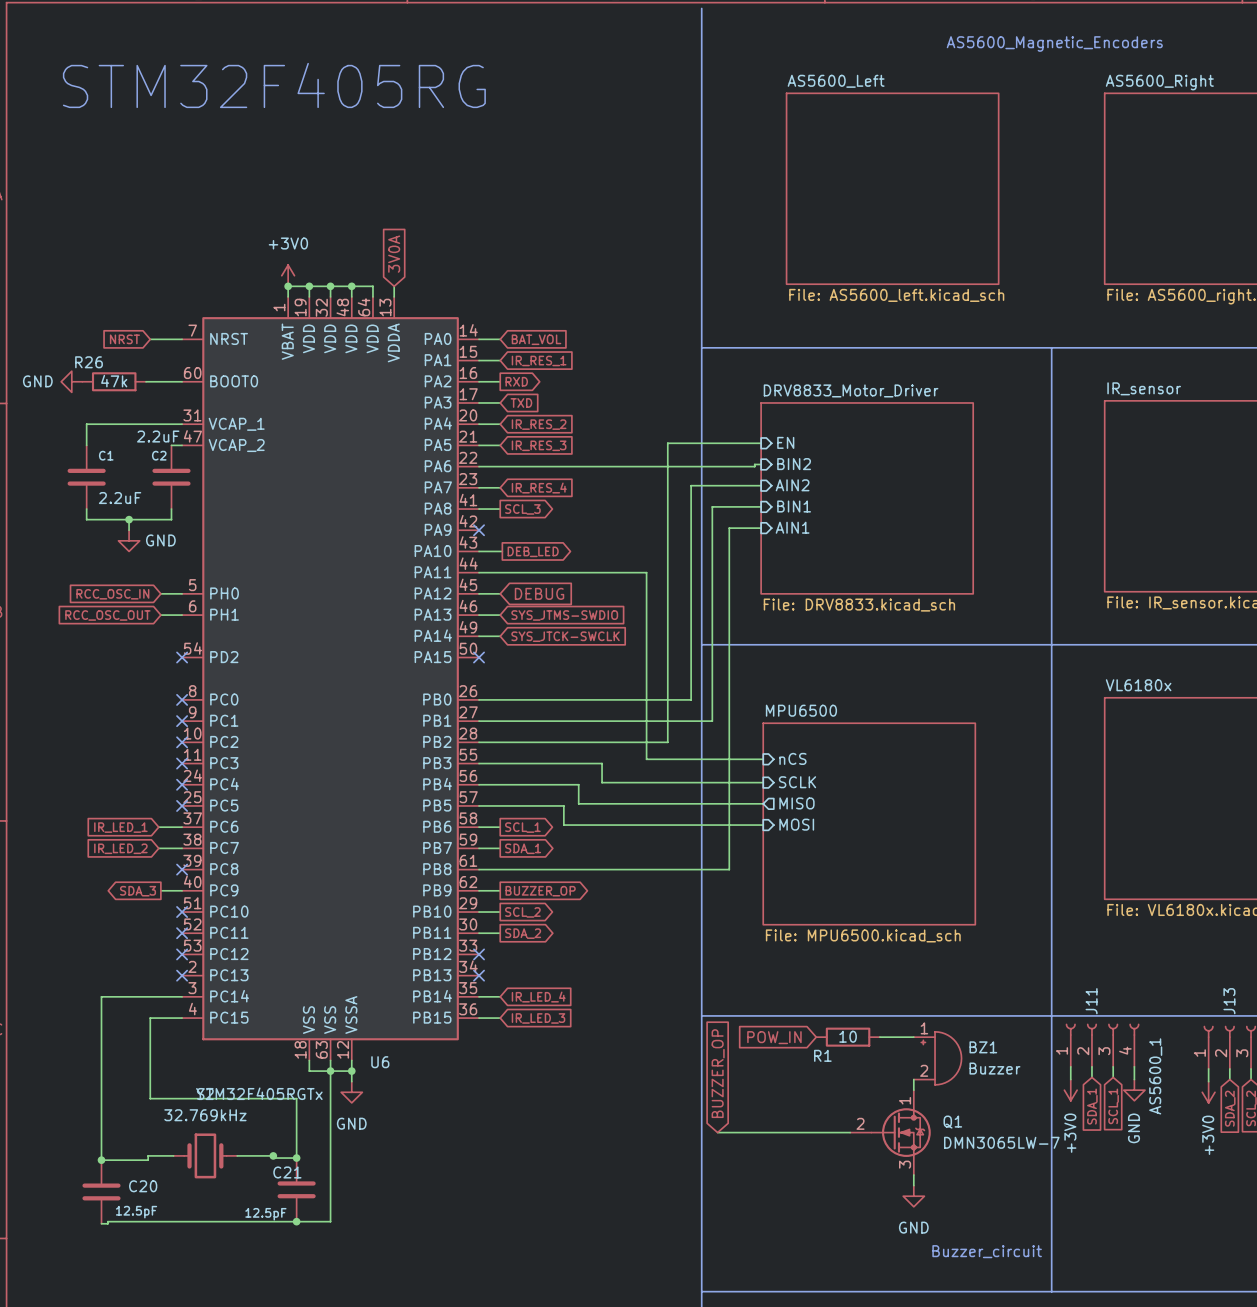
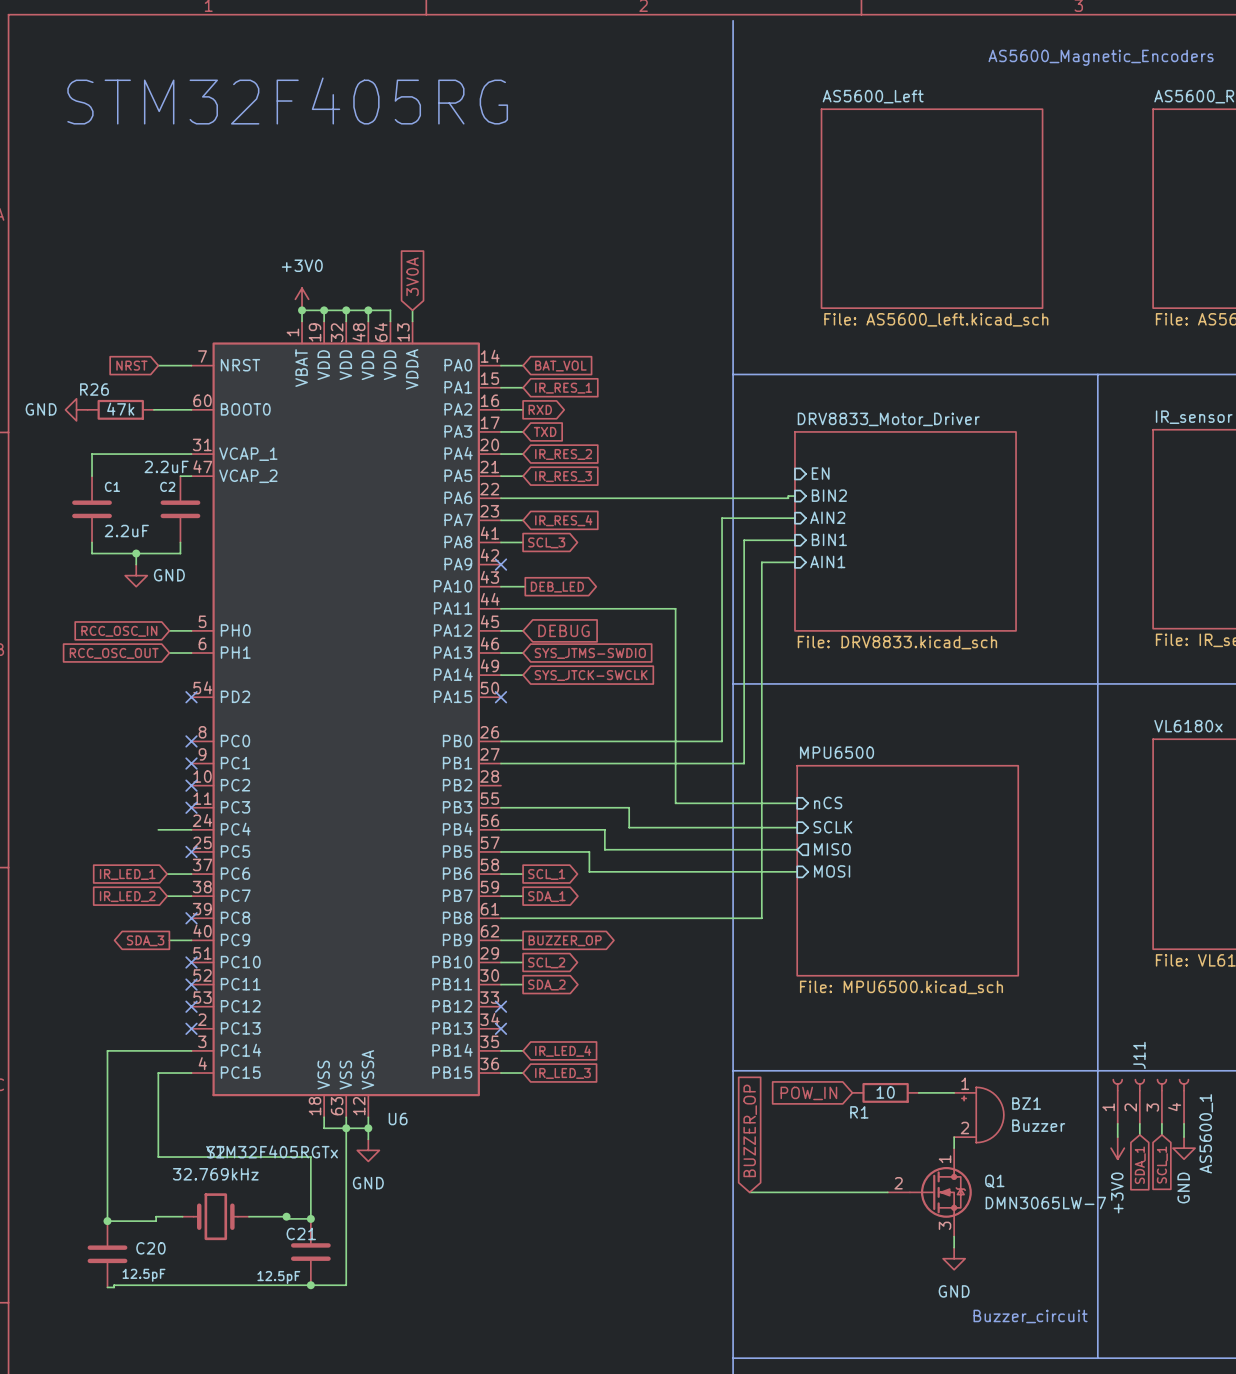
wire: (761, 443) (667, 443) (667, 742) (479, 742) -> none
wire: none -> (158, 829) (191, 829)
no-connect mark: (182, 784) -> none

